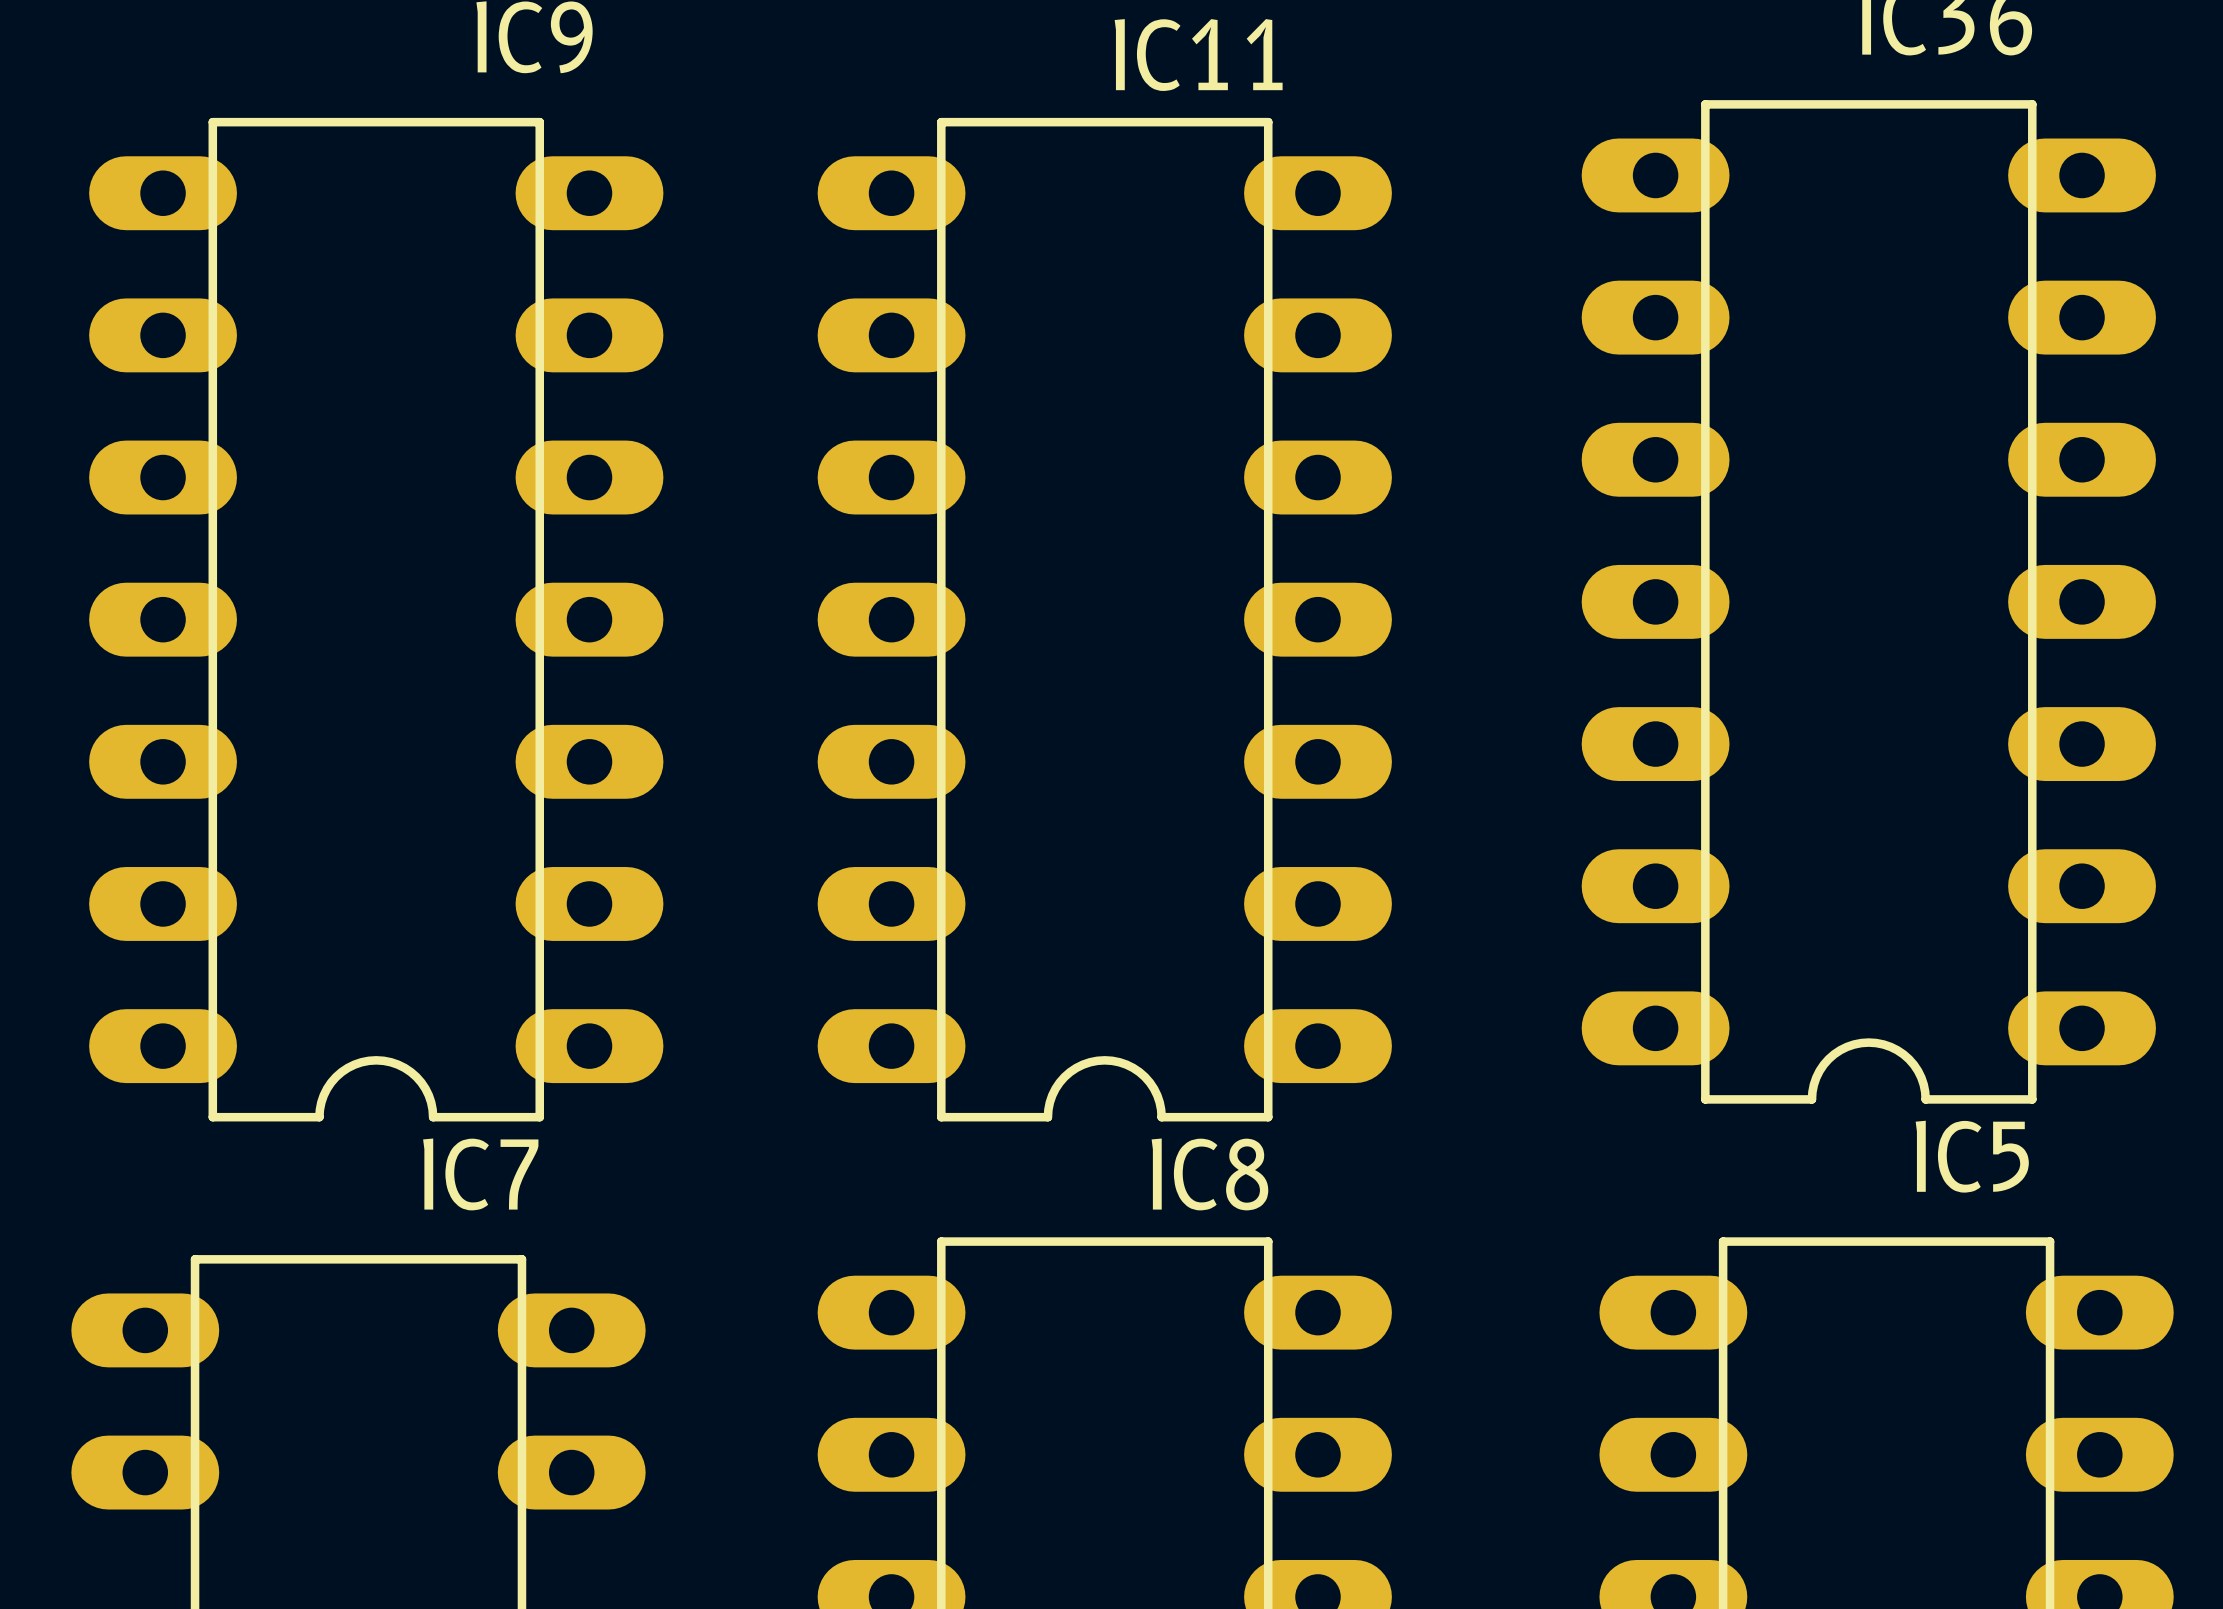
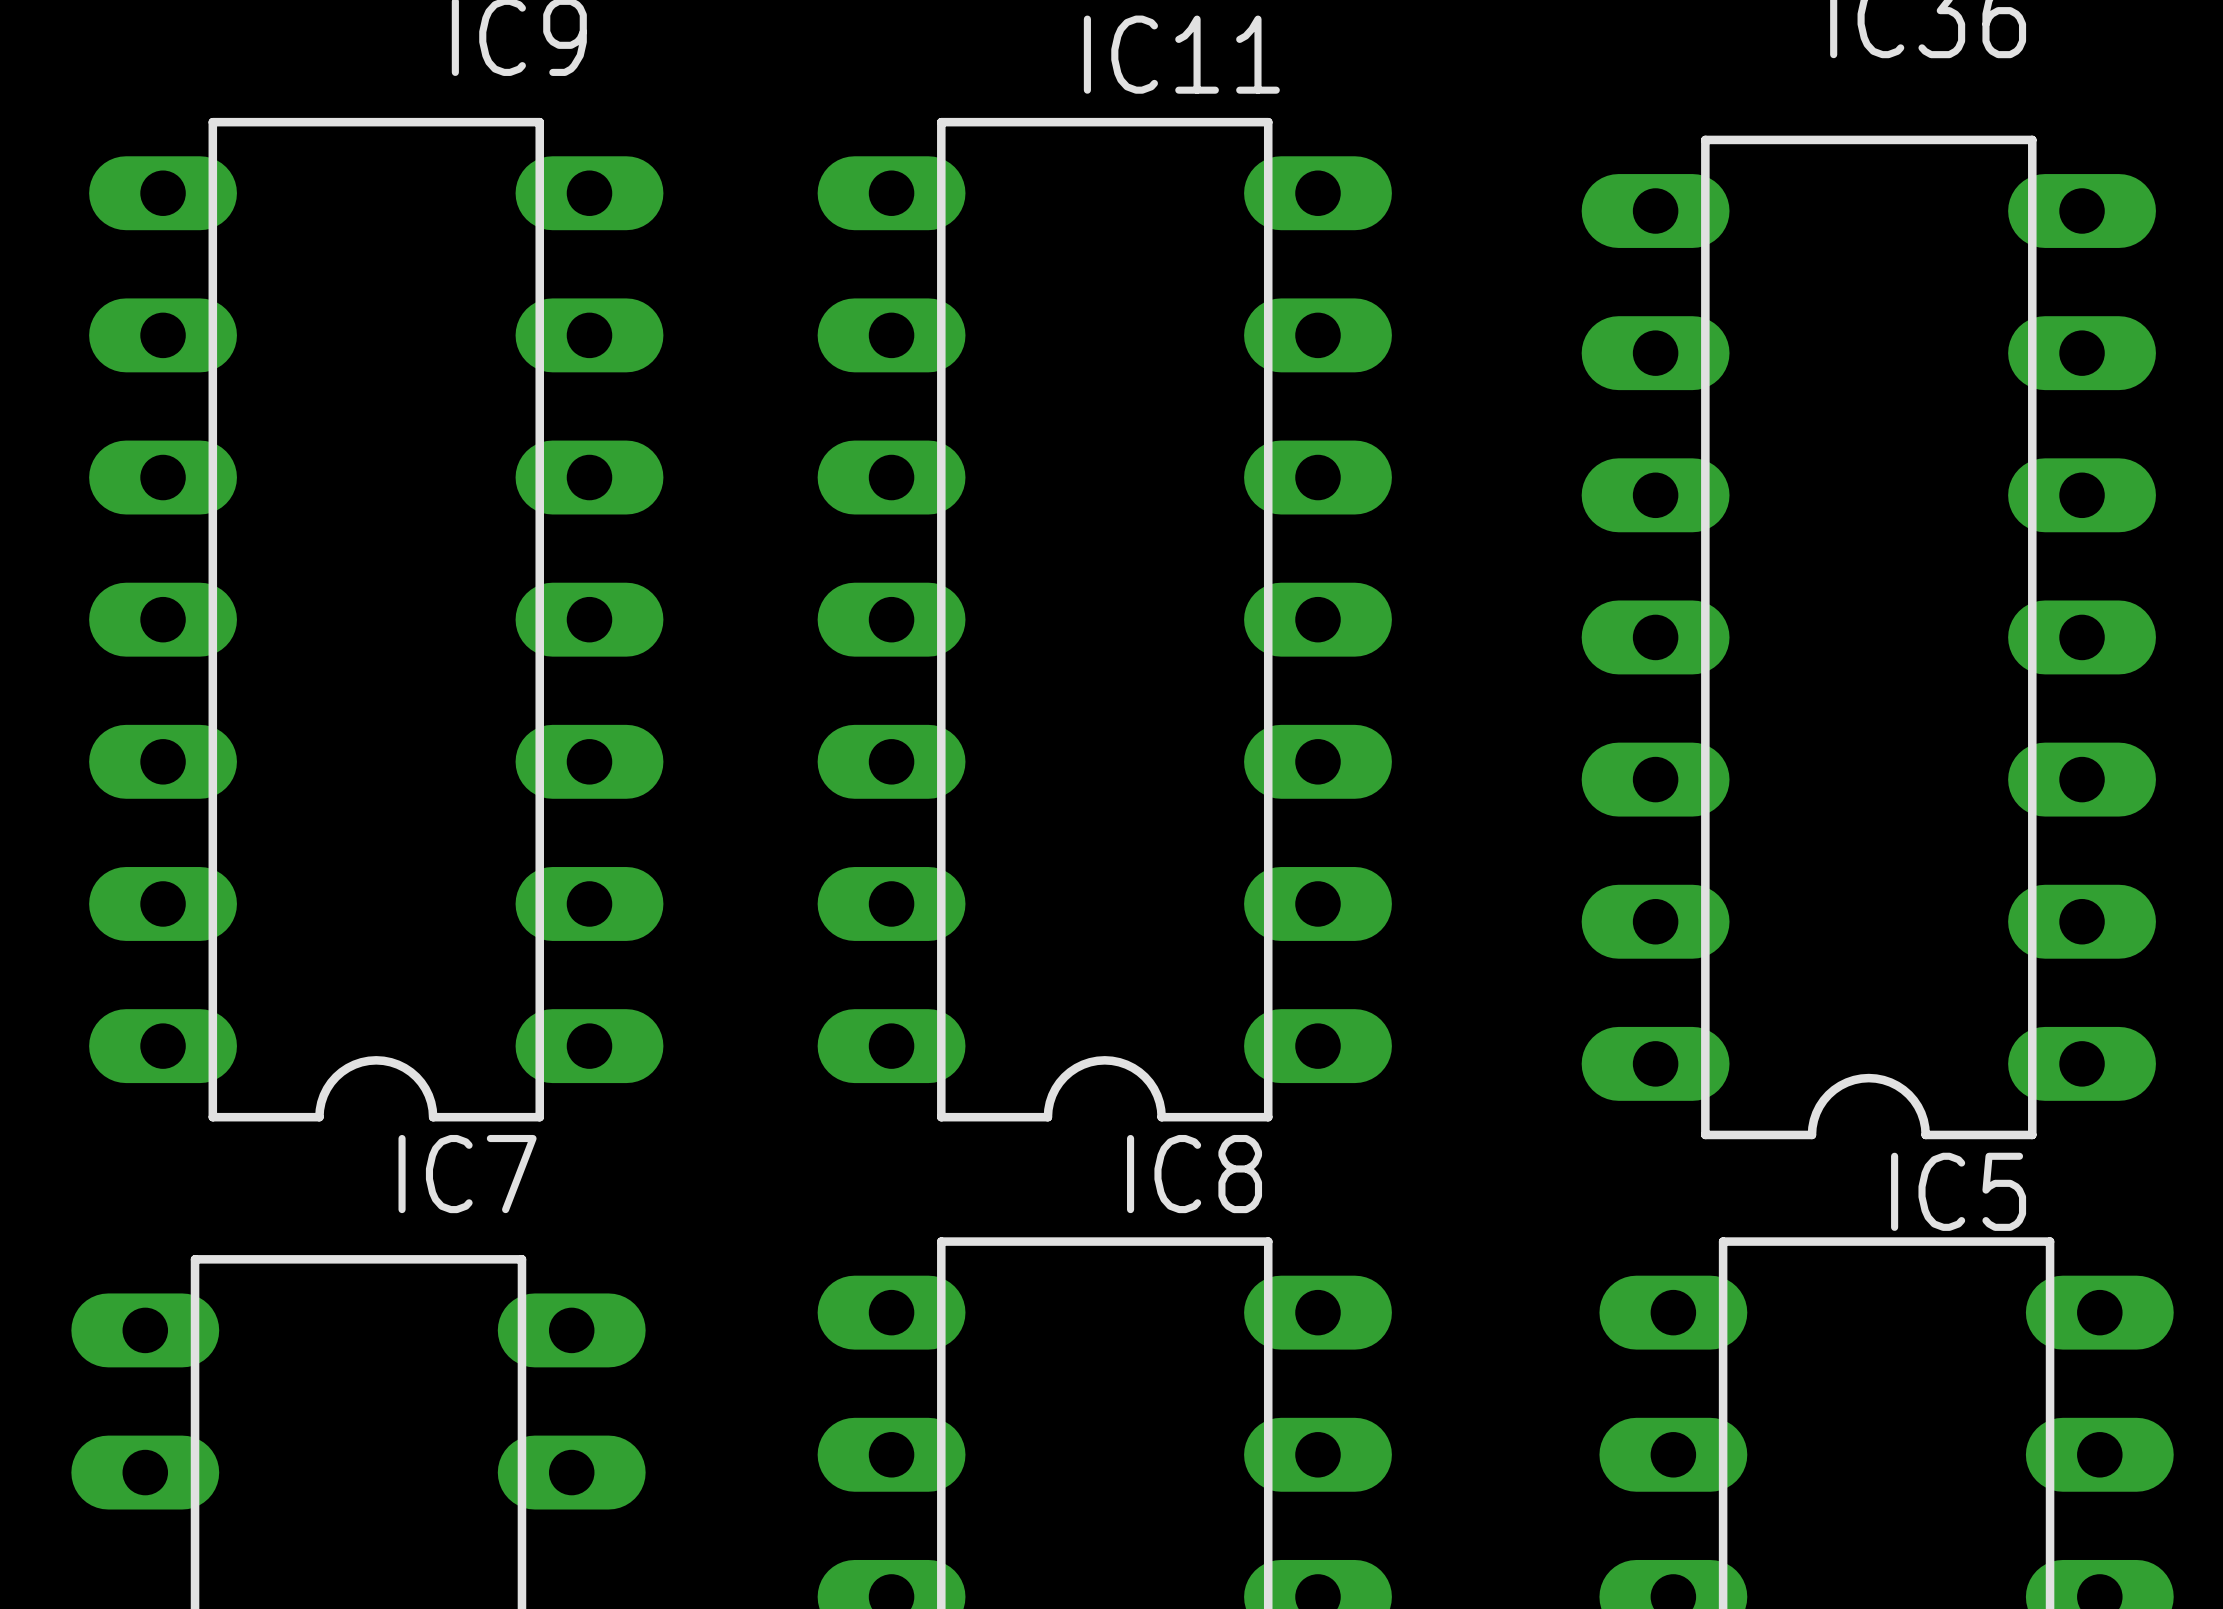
IC5 position: (1868, 601) -> (1868, 637)

